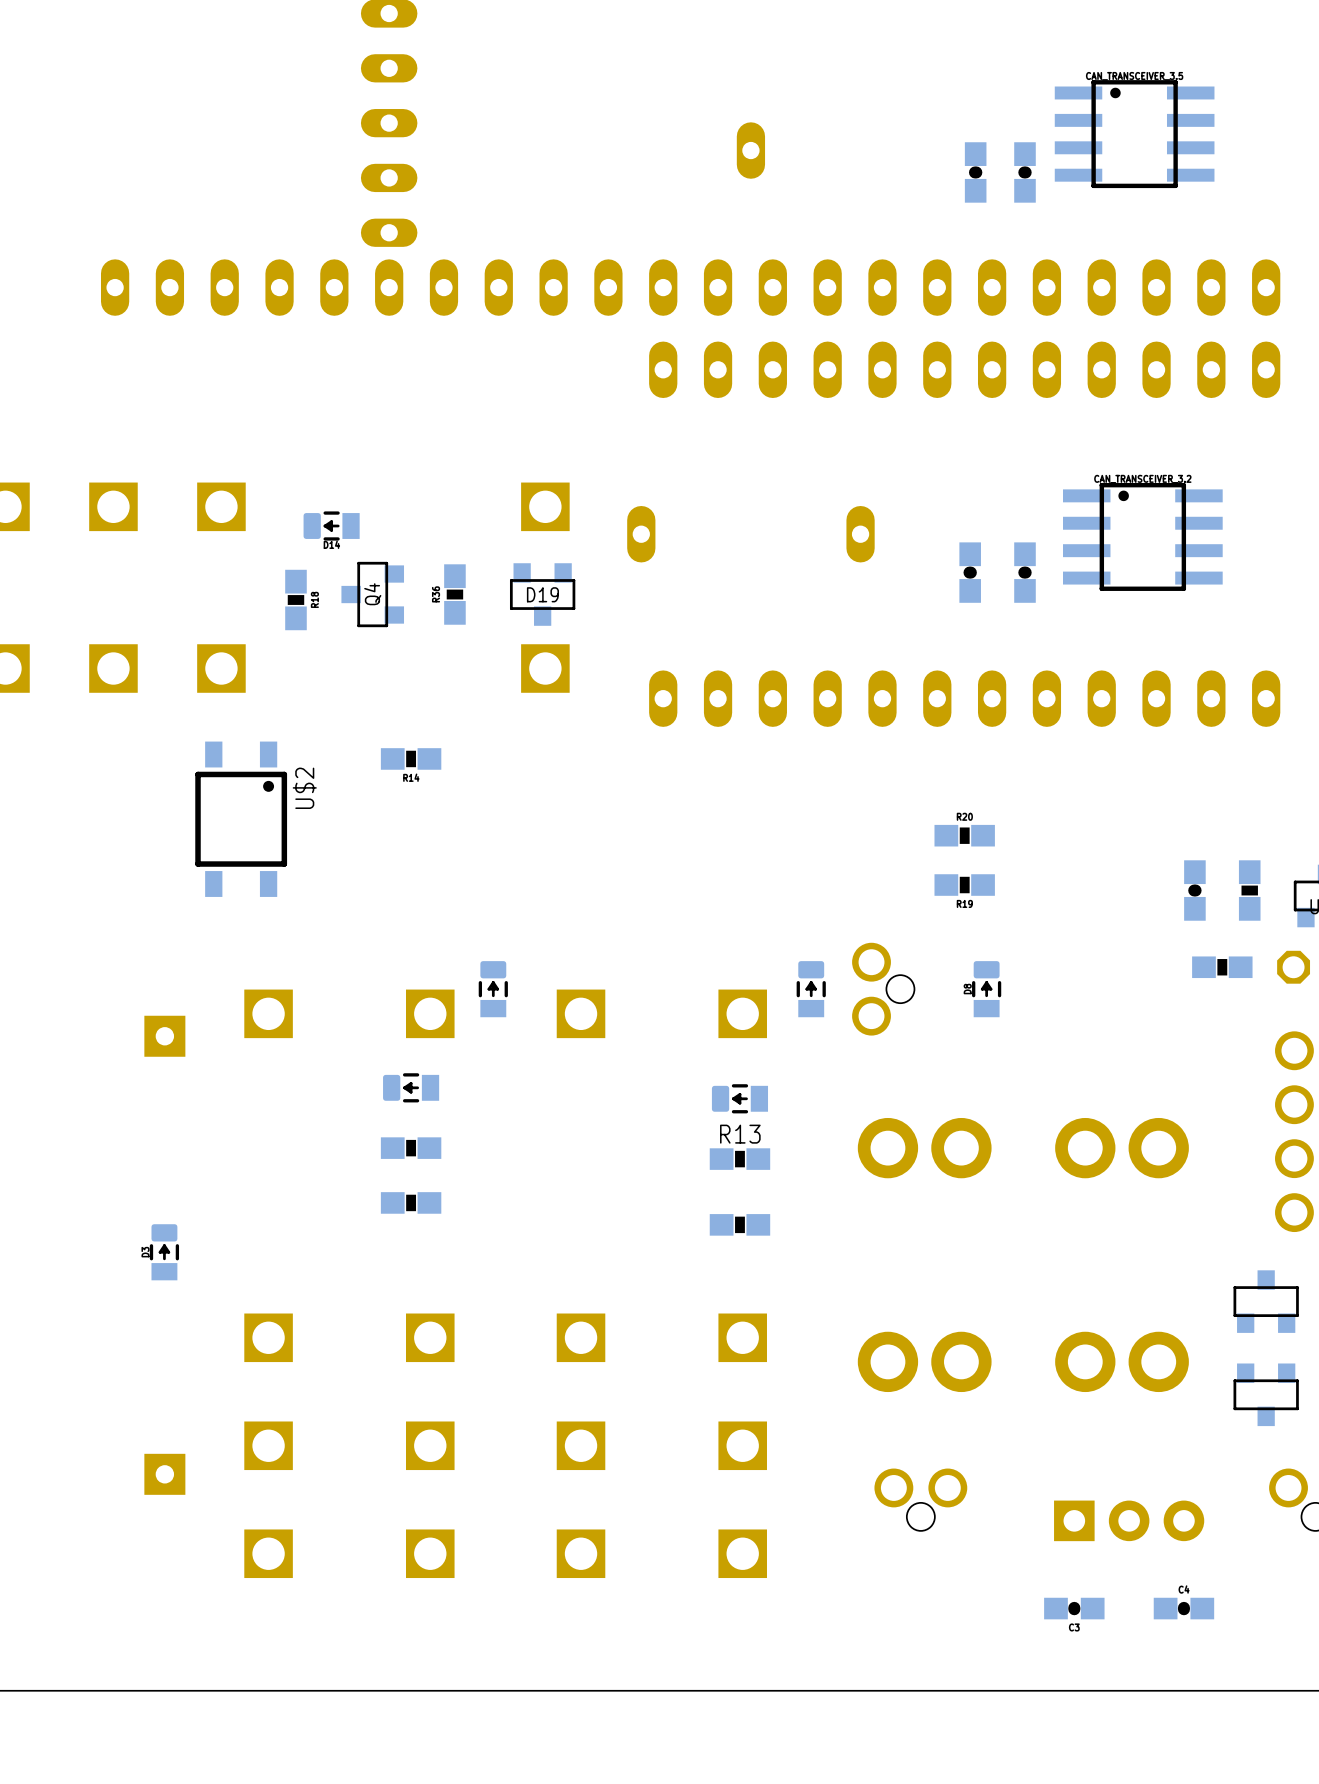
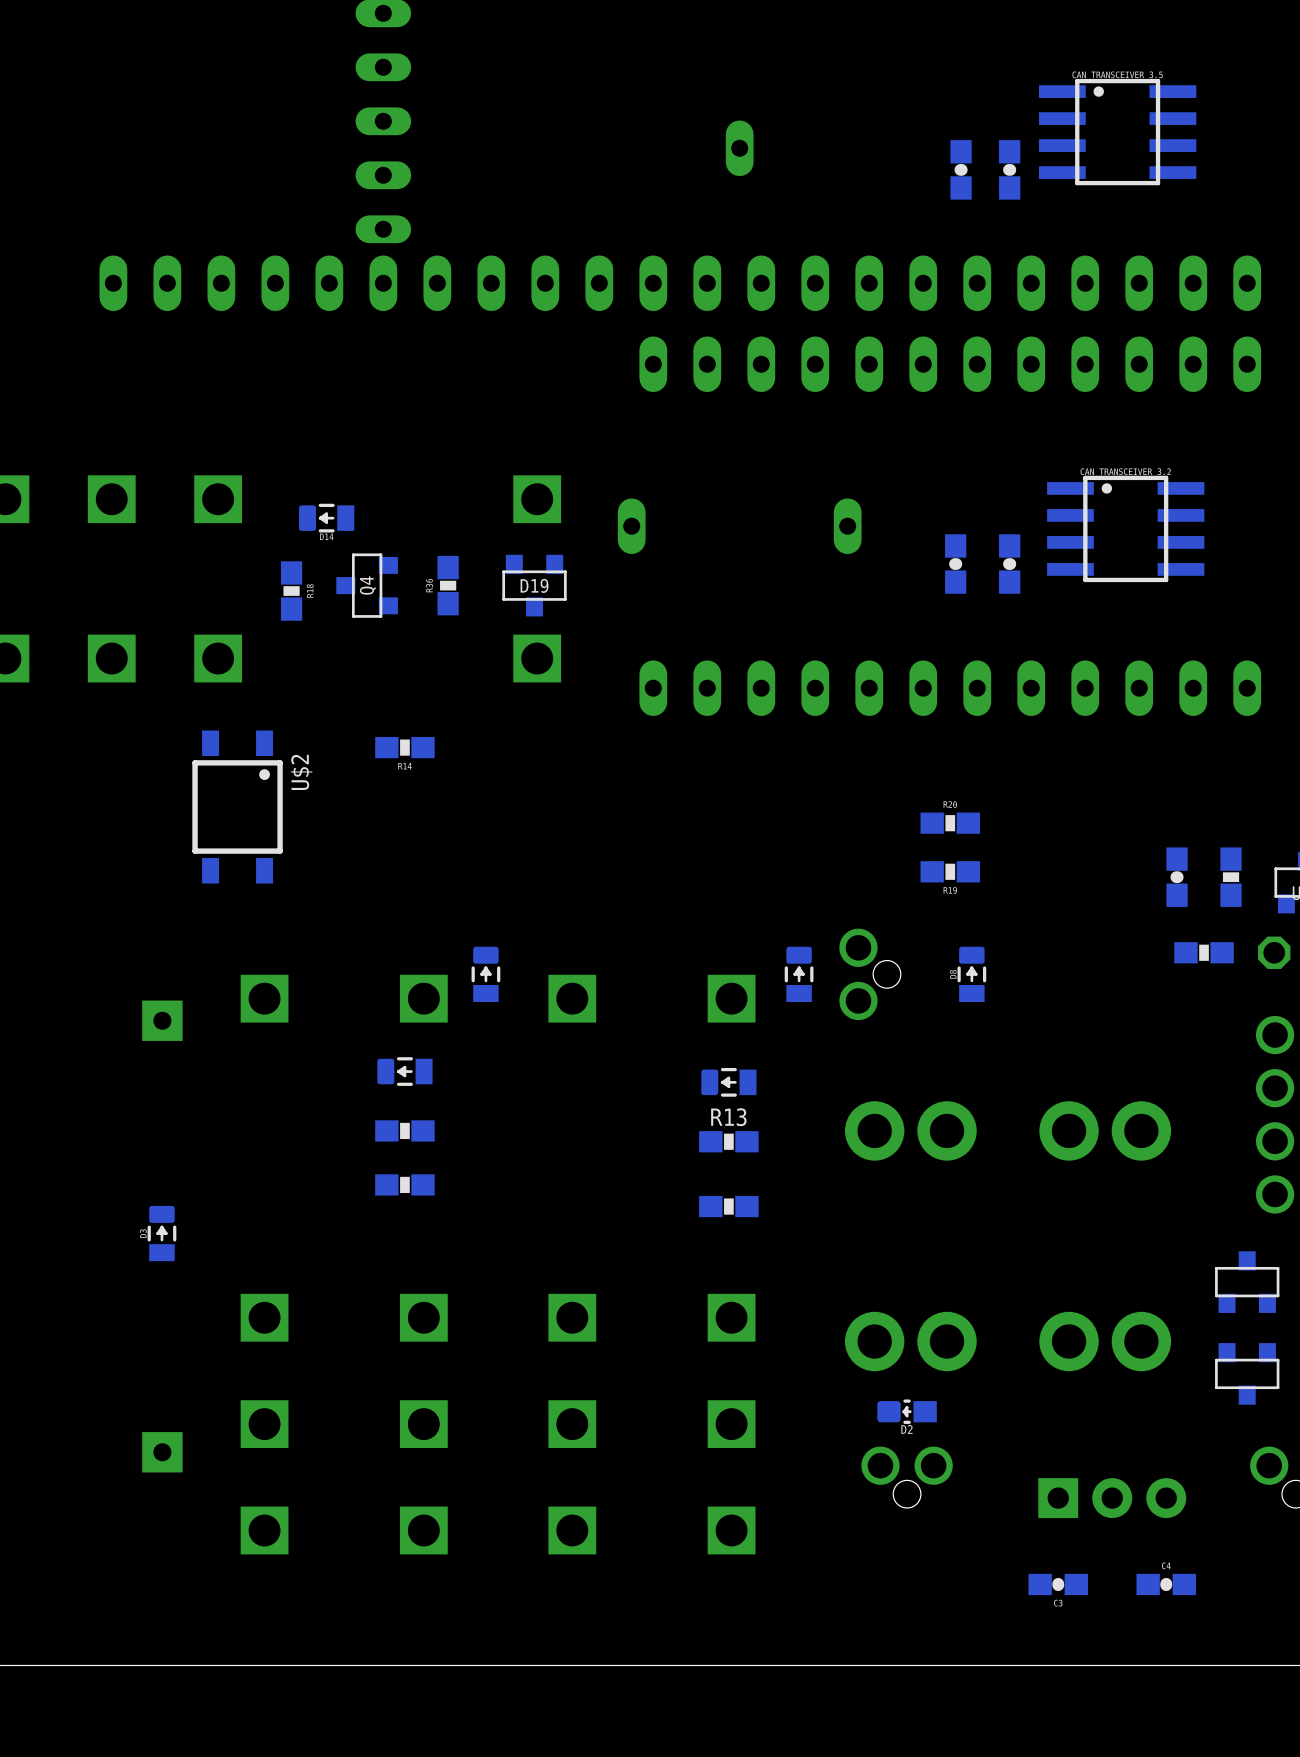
D2: none -> (907, 1411)

